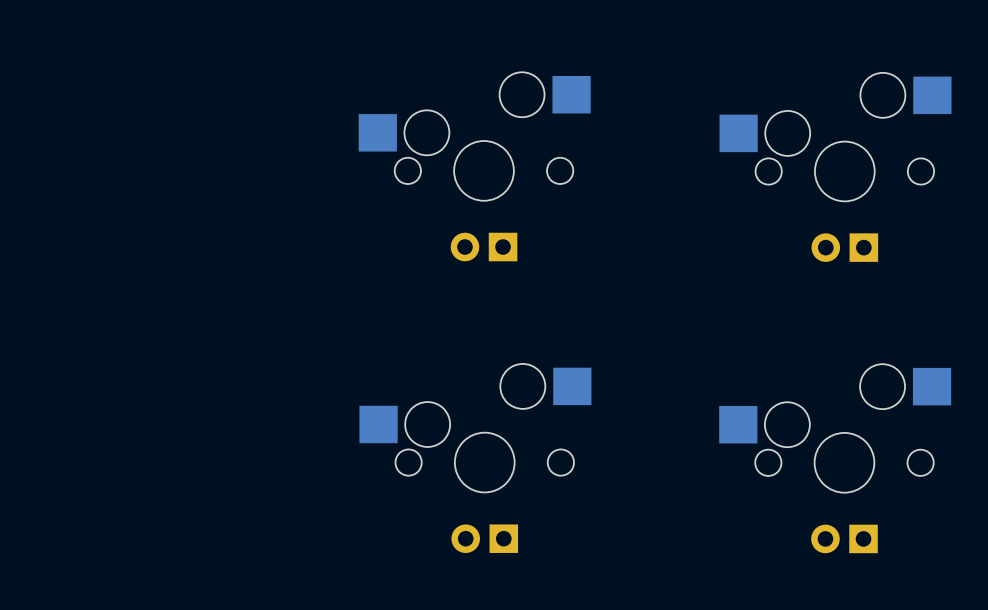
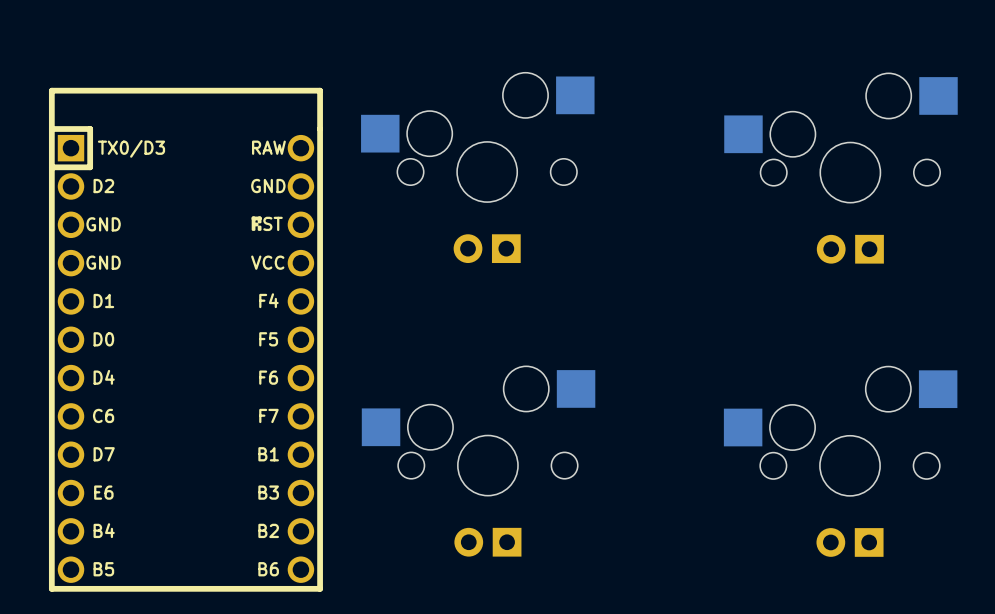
part: none -> (185, 339)

